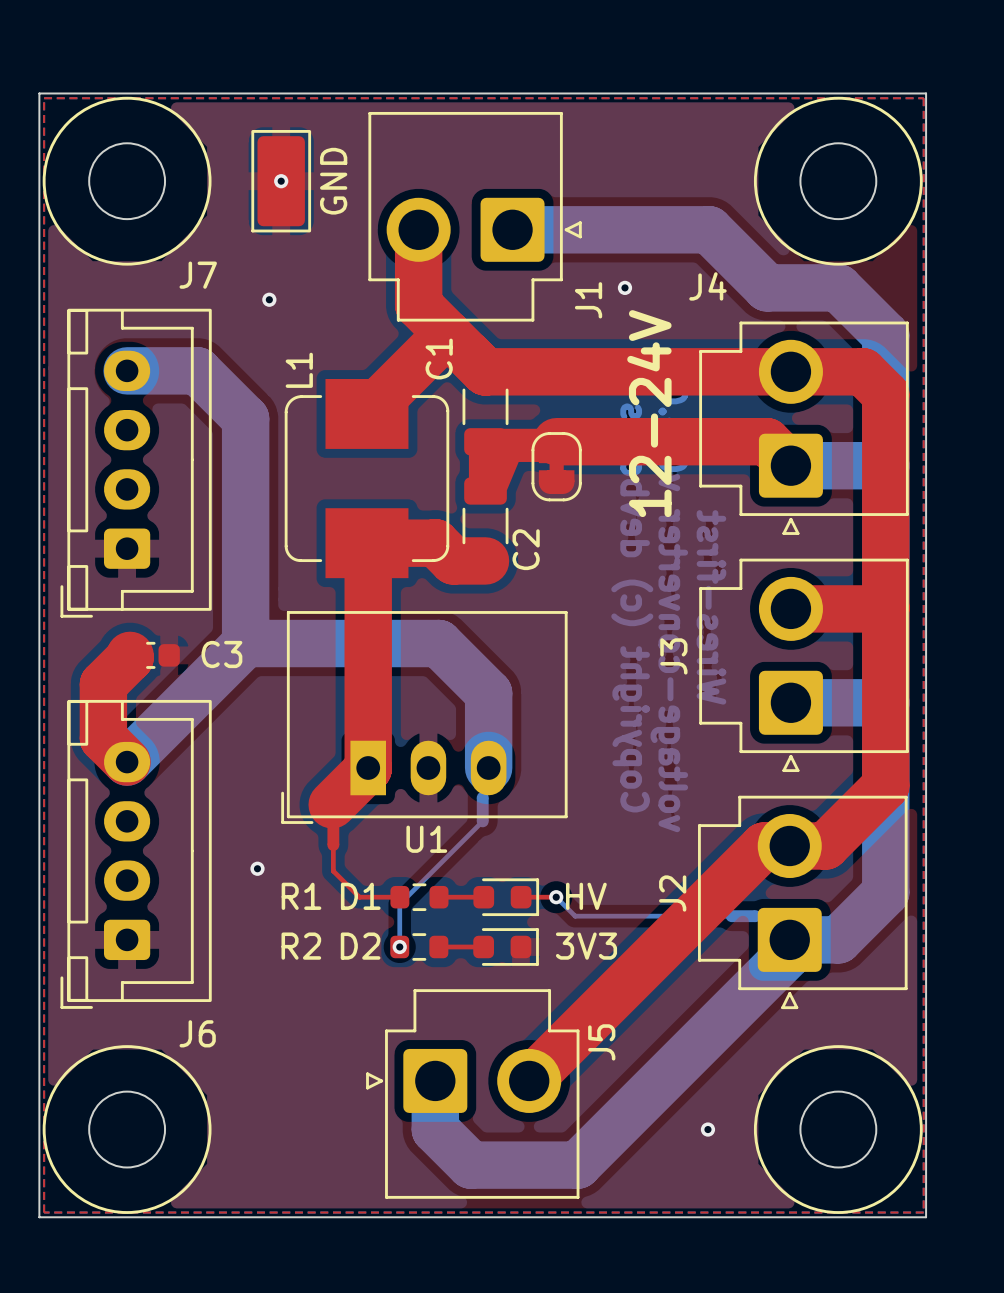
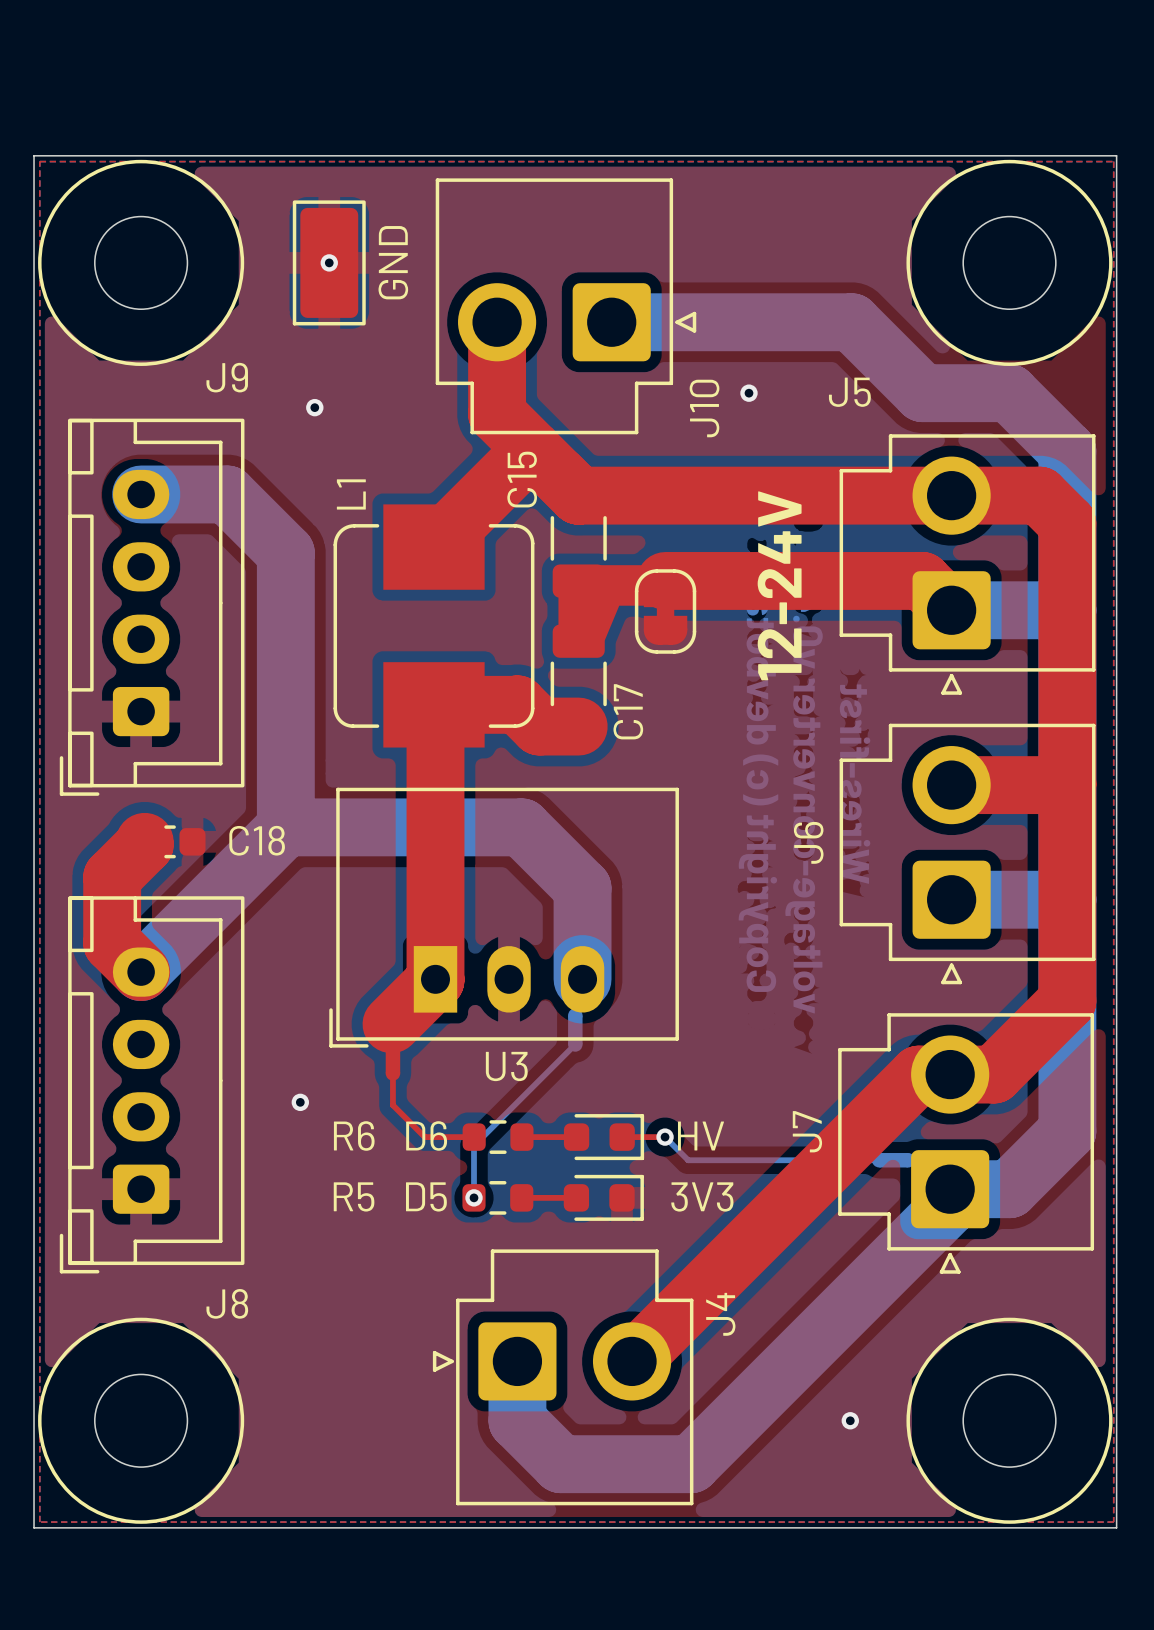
J7 name: J7 (198, 275) -> J9 (227, 377)
J4 name: J4 (707, 286) -> J5 (849, 392)
J1 name: J1 (588, 300) -> J10 (704, 408)
C1 name: C1 (439, 359) -> C15 (522, 479)
C2 name: C2 (526, 549) -> C17 (628, 711)
C3 name: C3 (221, 654) -> C18 (257, 840)
J3 name: J3 (673, 656) -> J6 (808, 842)
U1 name: U1 (426, 839) -> U3 (506, 1066)
J2 name: J2 (672, 893) -> J7 (807, 1131)
R1 name: R1 (301, 896) -> R6 (354, 1135)
D1 name: D1 (360, 896) -> D6 (426, 1135)
R2 name: R2 (301, 946) -> R5 (354, 1196)
D2 name: D2 (360, 946) -> D5 (426, 1196)
J6 name: J6 (197, 1033) -> J8 (227, 1303)
J5 name: J5 (601, 1042) -> J4 (720, 1314)

